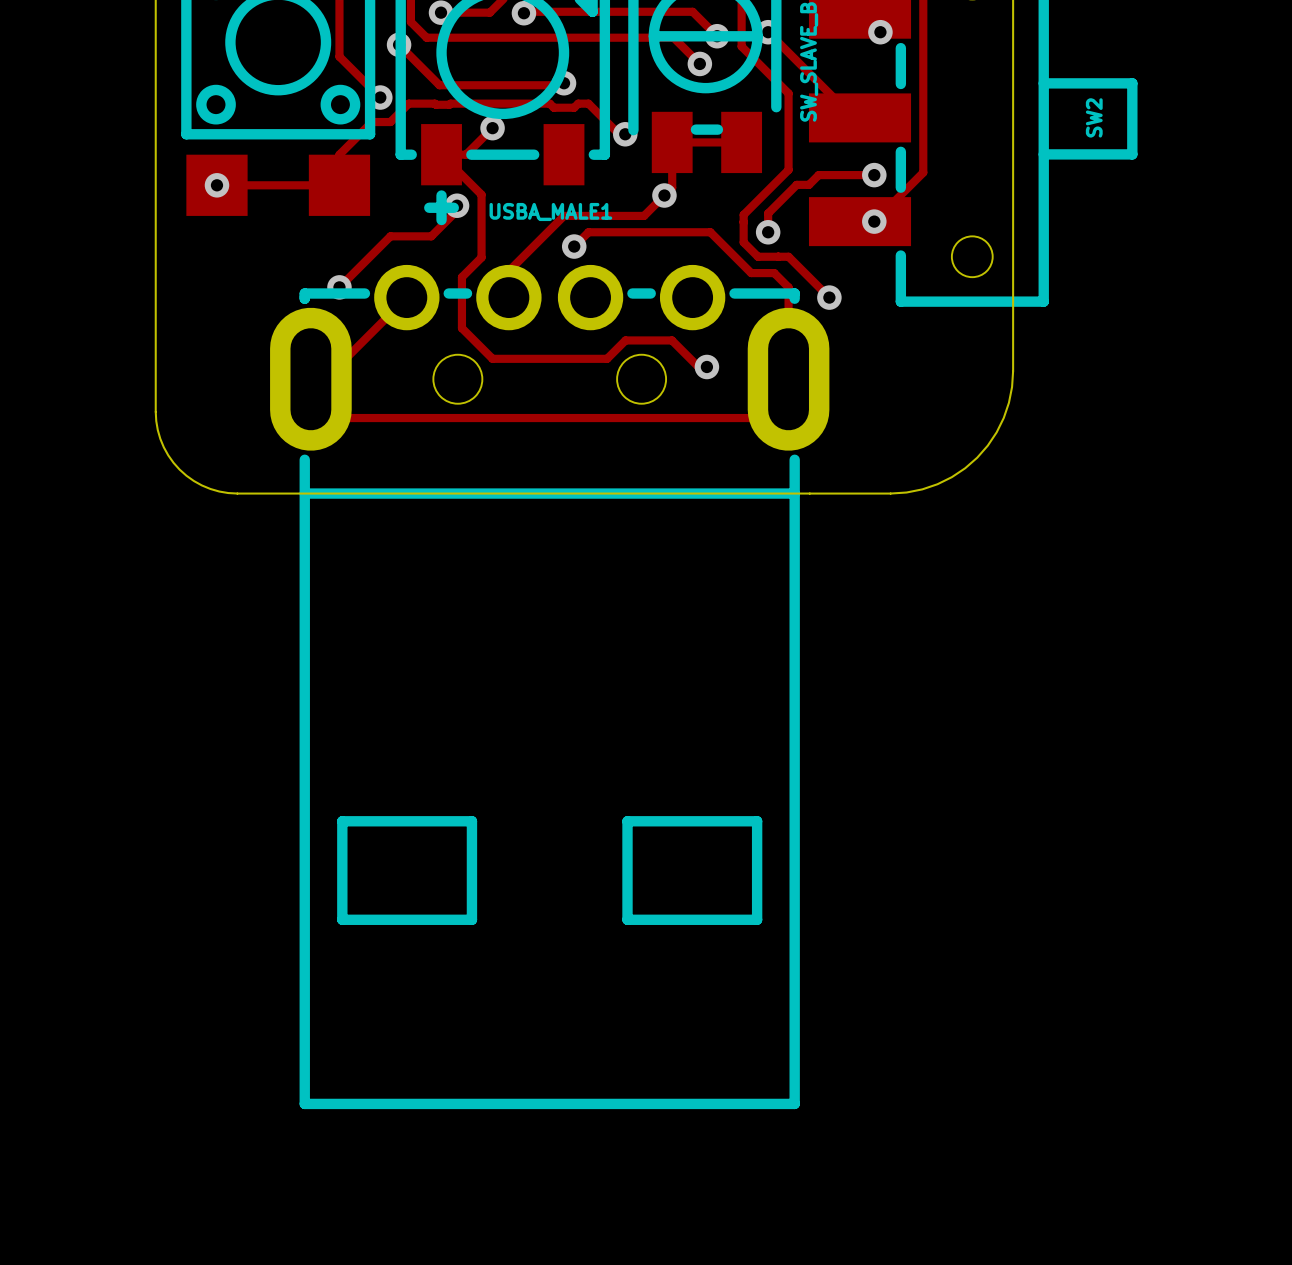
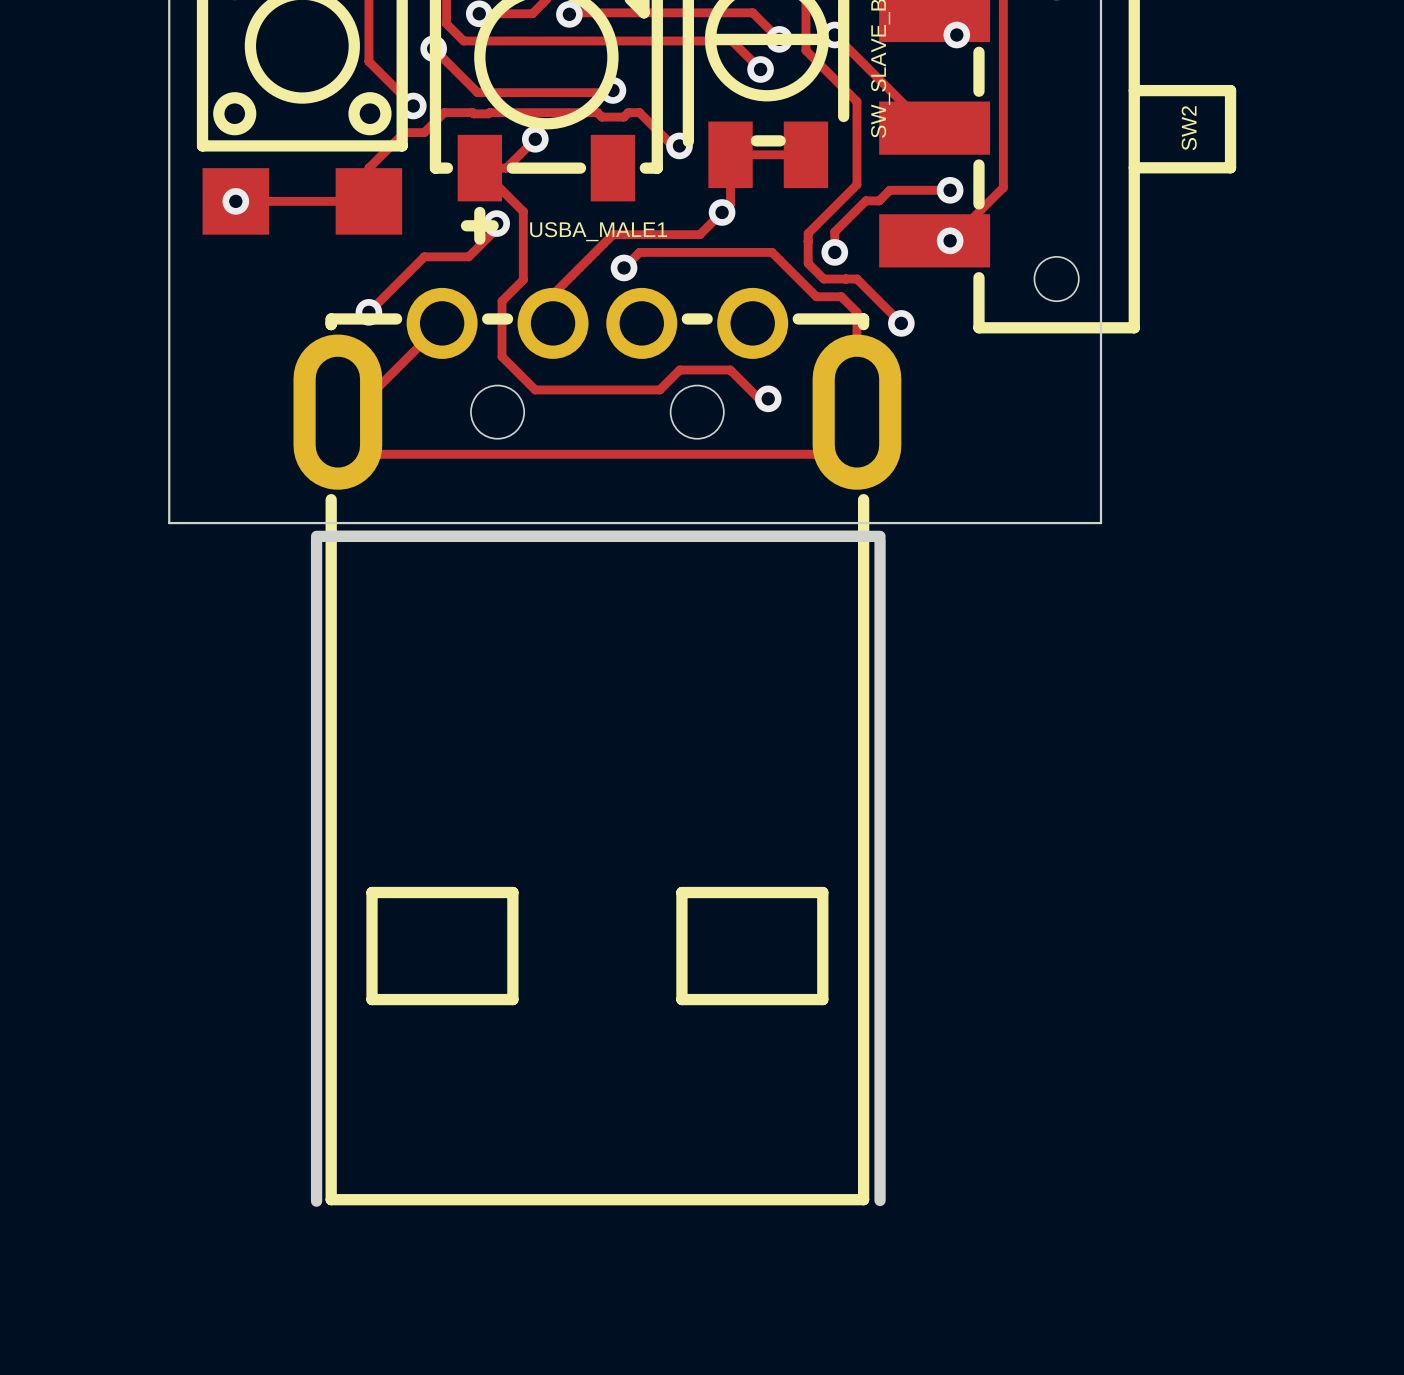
USBA_MALE1 footprint: [270, 264, 830, 1110] -> [293, 287, 902, 1207]
board edge: (1013, 371) (1008, 402) (1003, 417) (987, 445) (977, 457) (965, 468) (937, 484) (906, 492) (890, 493) (228, 493) (201, 485) (179, 469) (163, 447) (157, 430) (155, 411) -> (1101, 403) (1101, 523) (169, 523) (169, 447)

